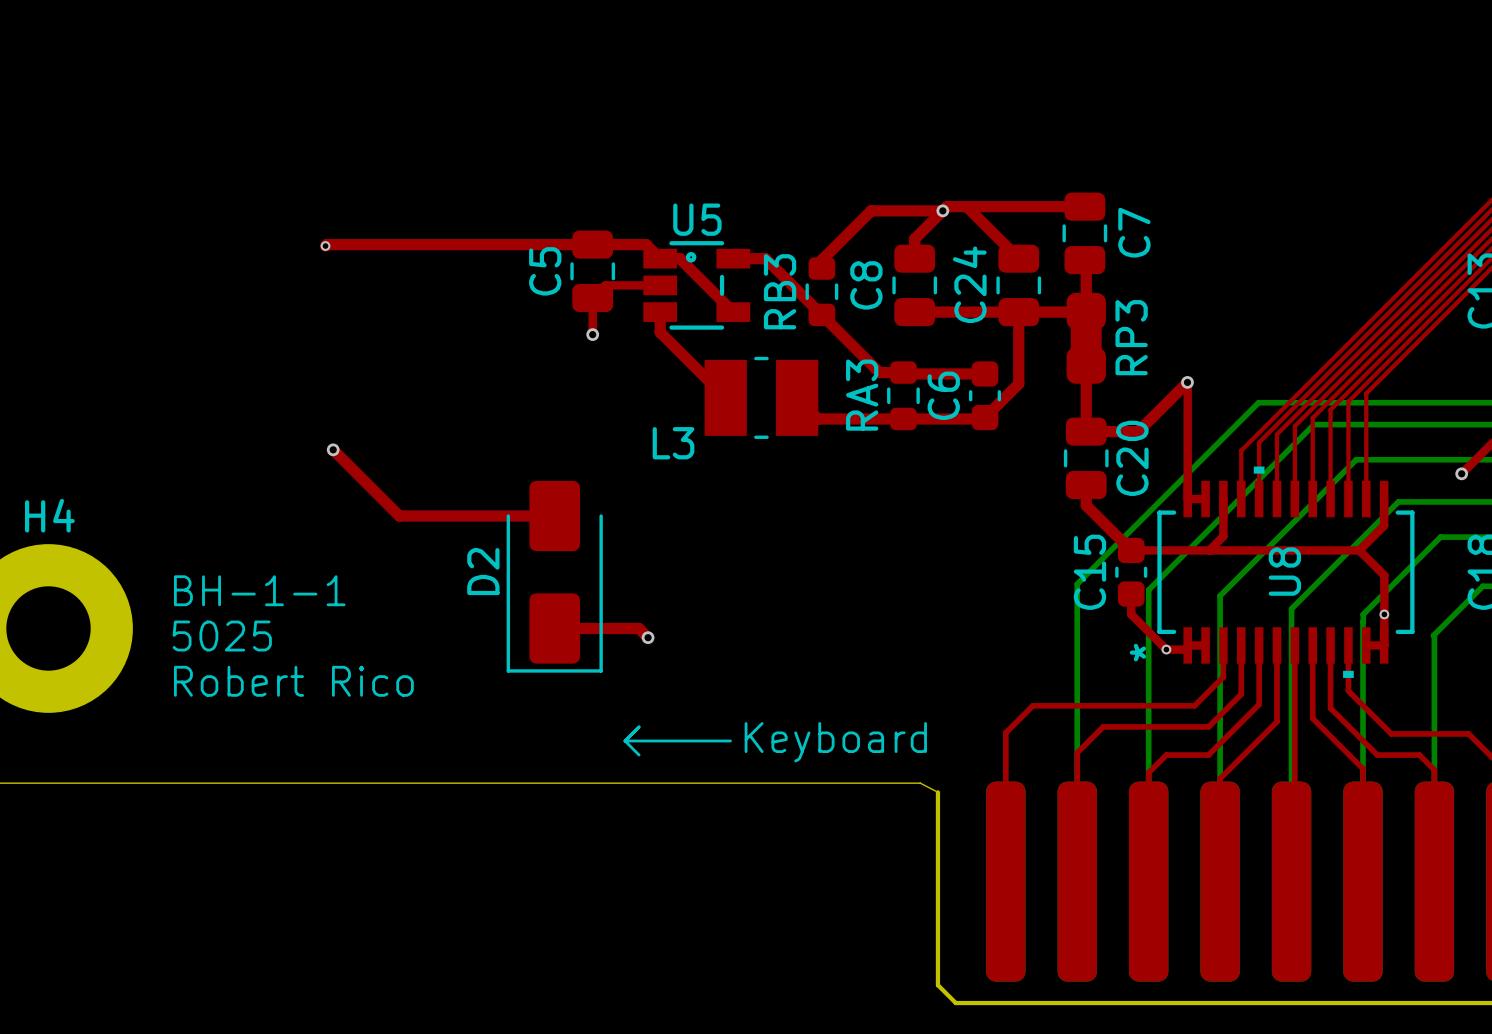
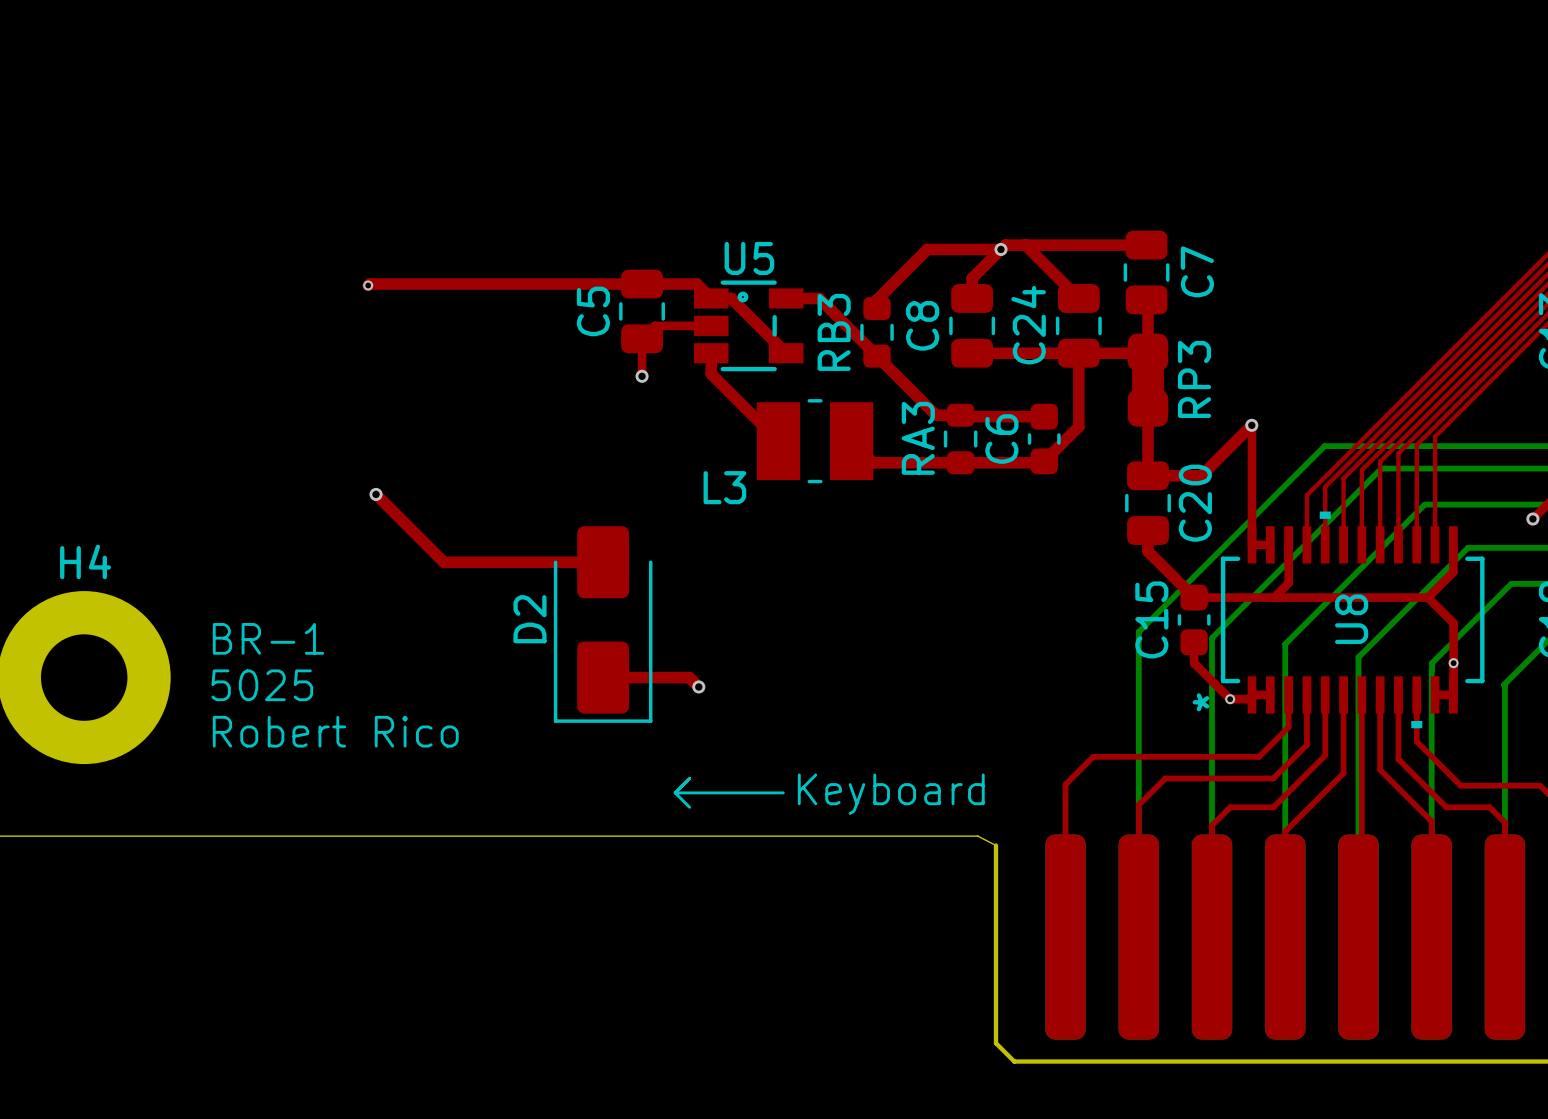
text: BH-1-1 (259, 590) -> BR-1 (268, 638)

